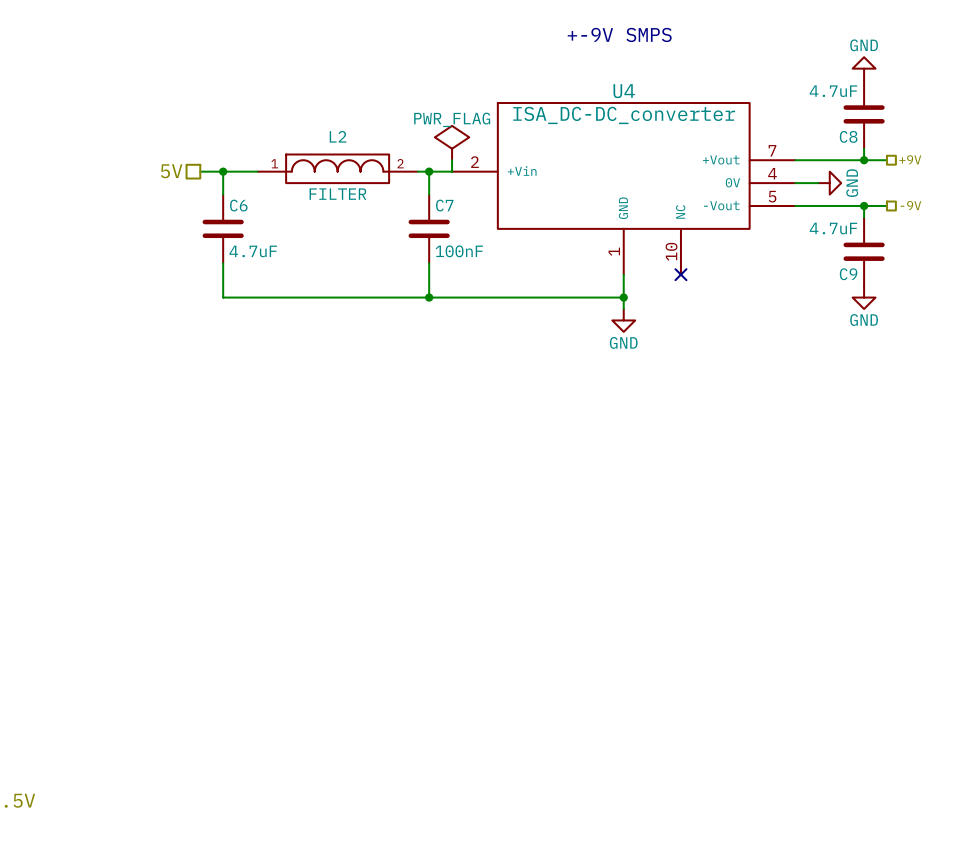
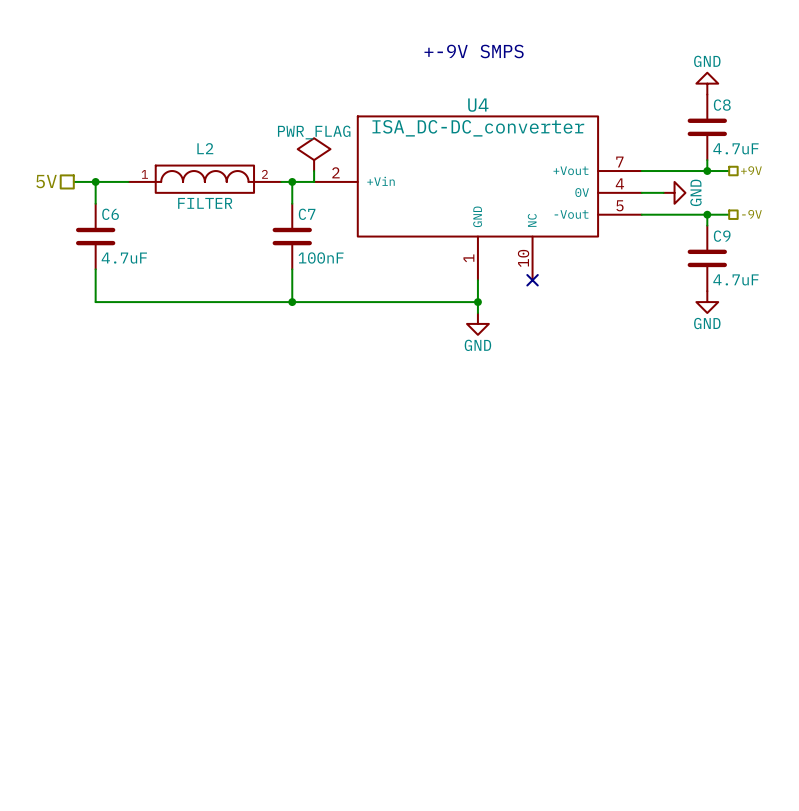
C8 value position: 4.7uF (833, 91) -> 4.7uF (735, 148)
C8 name position: C8 (848, 136) -> C8 (722, 105)
C9 value position: 4.7uF (833, 228) -> 4.7uF (735, 279)
C9 name position: C9 (848, 274) -> C9 (722, 236)

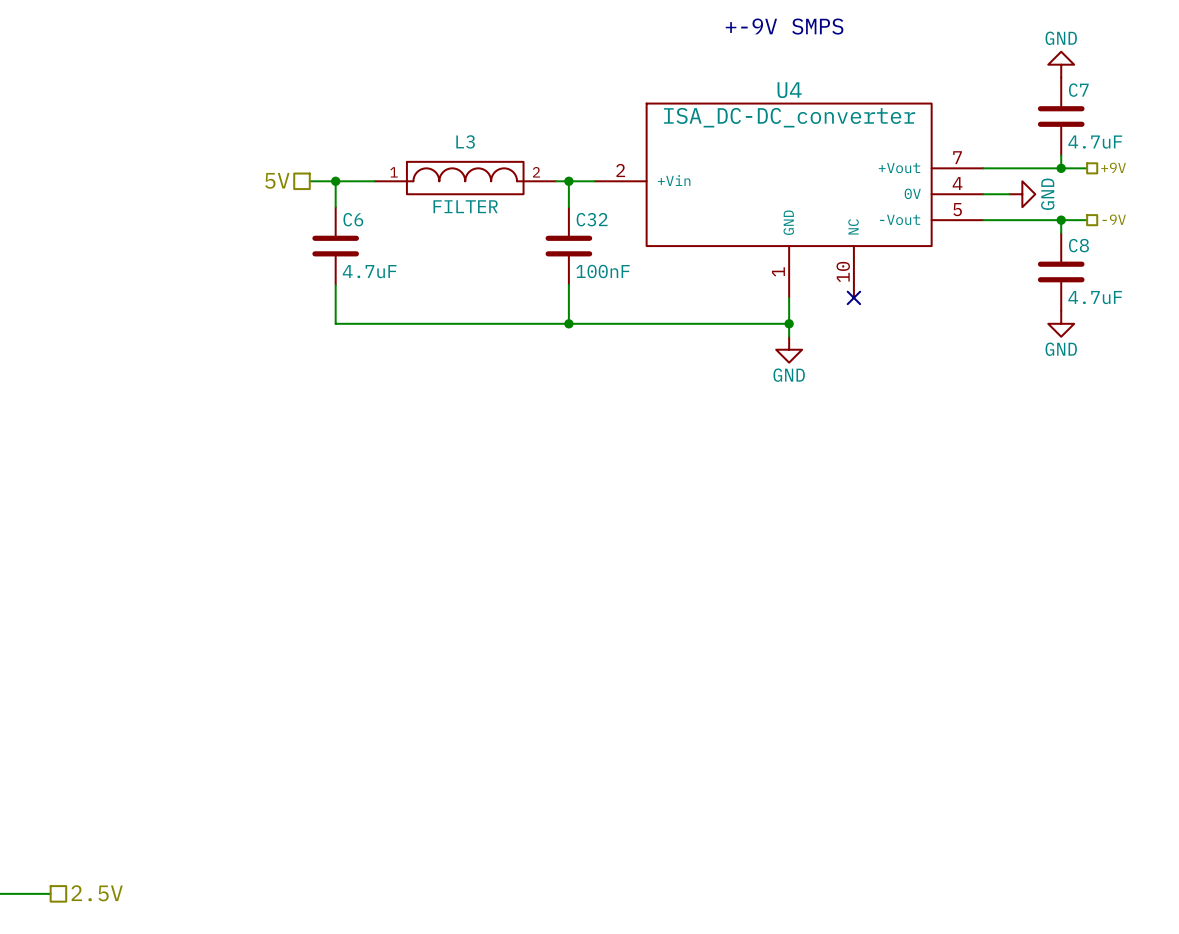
C8 name: C8 (722, 105) -> C7 (1078, 90)
L2 name: L2 (205, 148) -> L3 (465, 141)
power symbol: PWR_FLAG (314, 154) -> none
wire: (314, 171) (314, 181) -> none
C7 name: C7 (307, 214) -> C32 (592, 219)
C9 name: C9 (722, 236) -> C8 (1078, 245)

